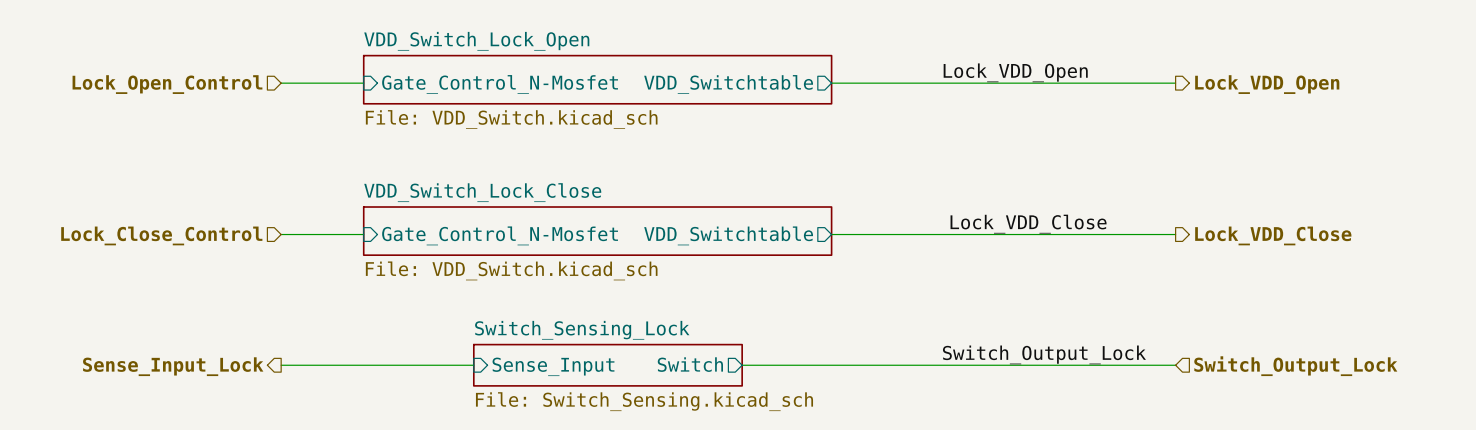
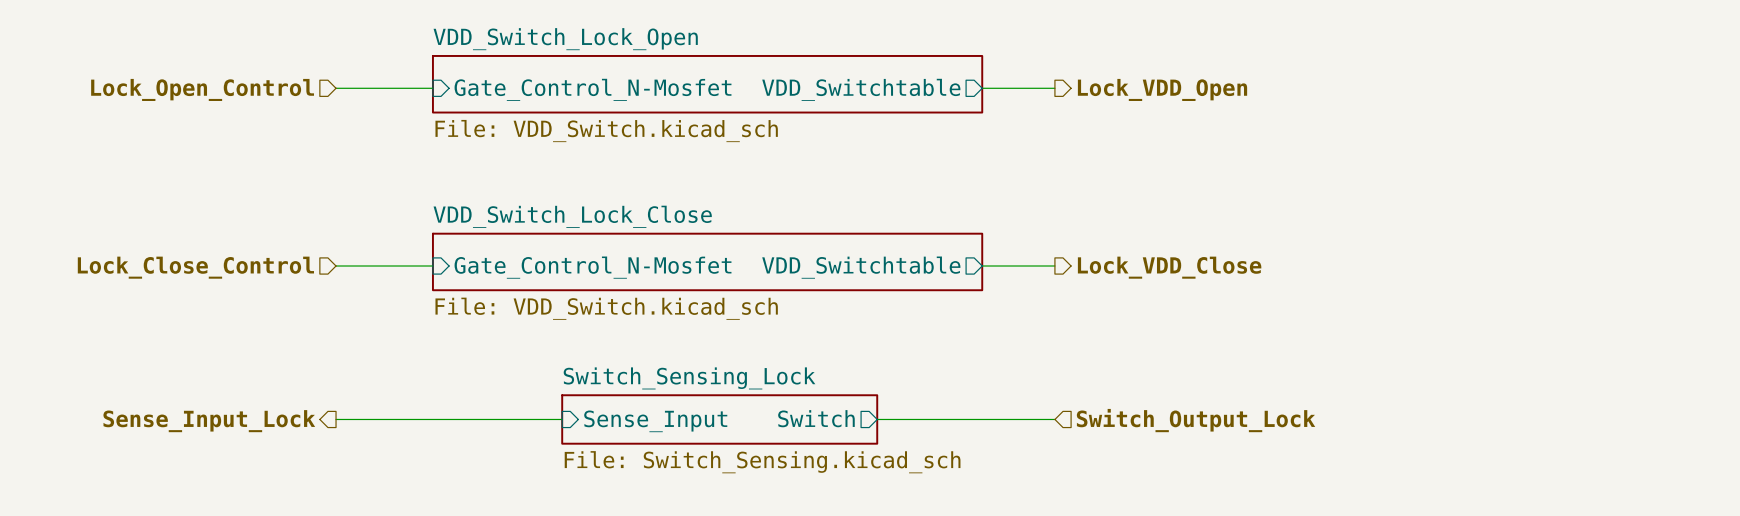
label: Lock_VDD_Open (1015, 72) -> none
wire: (893, 83) (1175, 83) -> none
hierarchical label: none -> Lock_VDD_Open (1162, 89)
hierarchical label: Lock_VDD_Open (1267, 84) -> none
label: Lock_VDD_Close (1028, 224) -> none
wire: (893, 234) (1175, 234) -> none
hierarchical label: none -> Lock_VDD_Close (1169, 267)
hierarchical label: Lock_VDD_Close (1273, 235) -> none
label: Switch_Output_Lock (1044, 354) -> none
wire: (893, 365) (1175, 365) -> none
hierarchical label: none -> Switch_Output_Lock (1196, 420)
hierarchical label: Switch_Output_Lock (1295, 366) -> none

